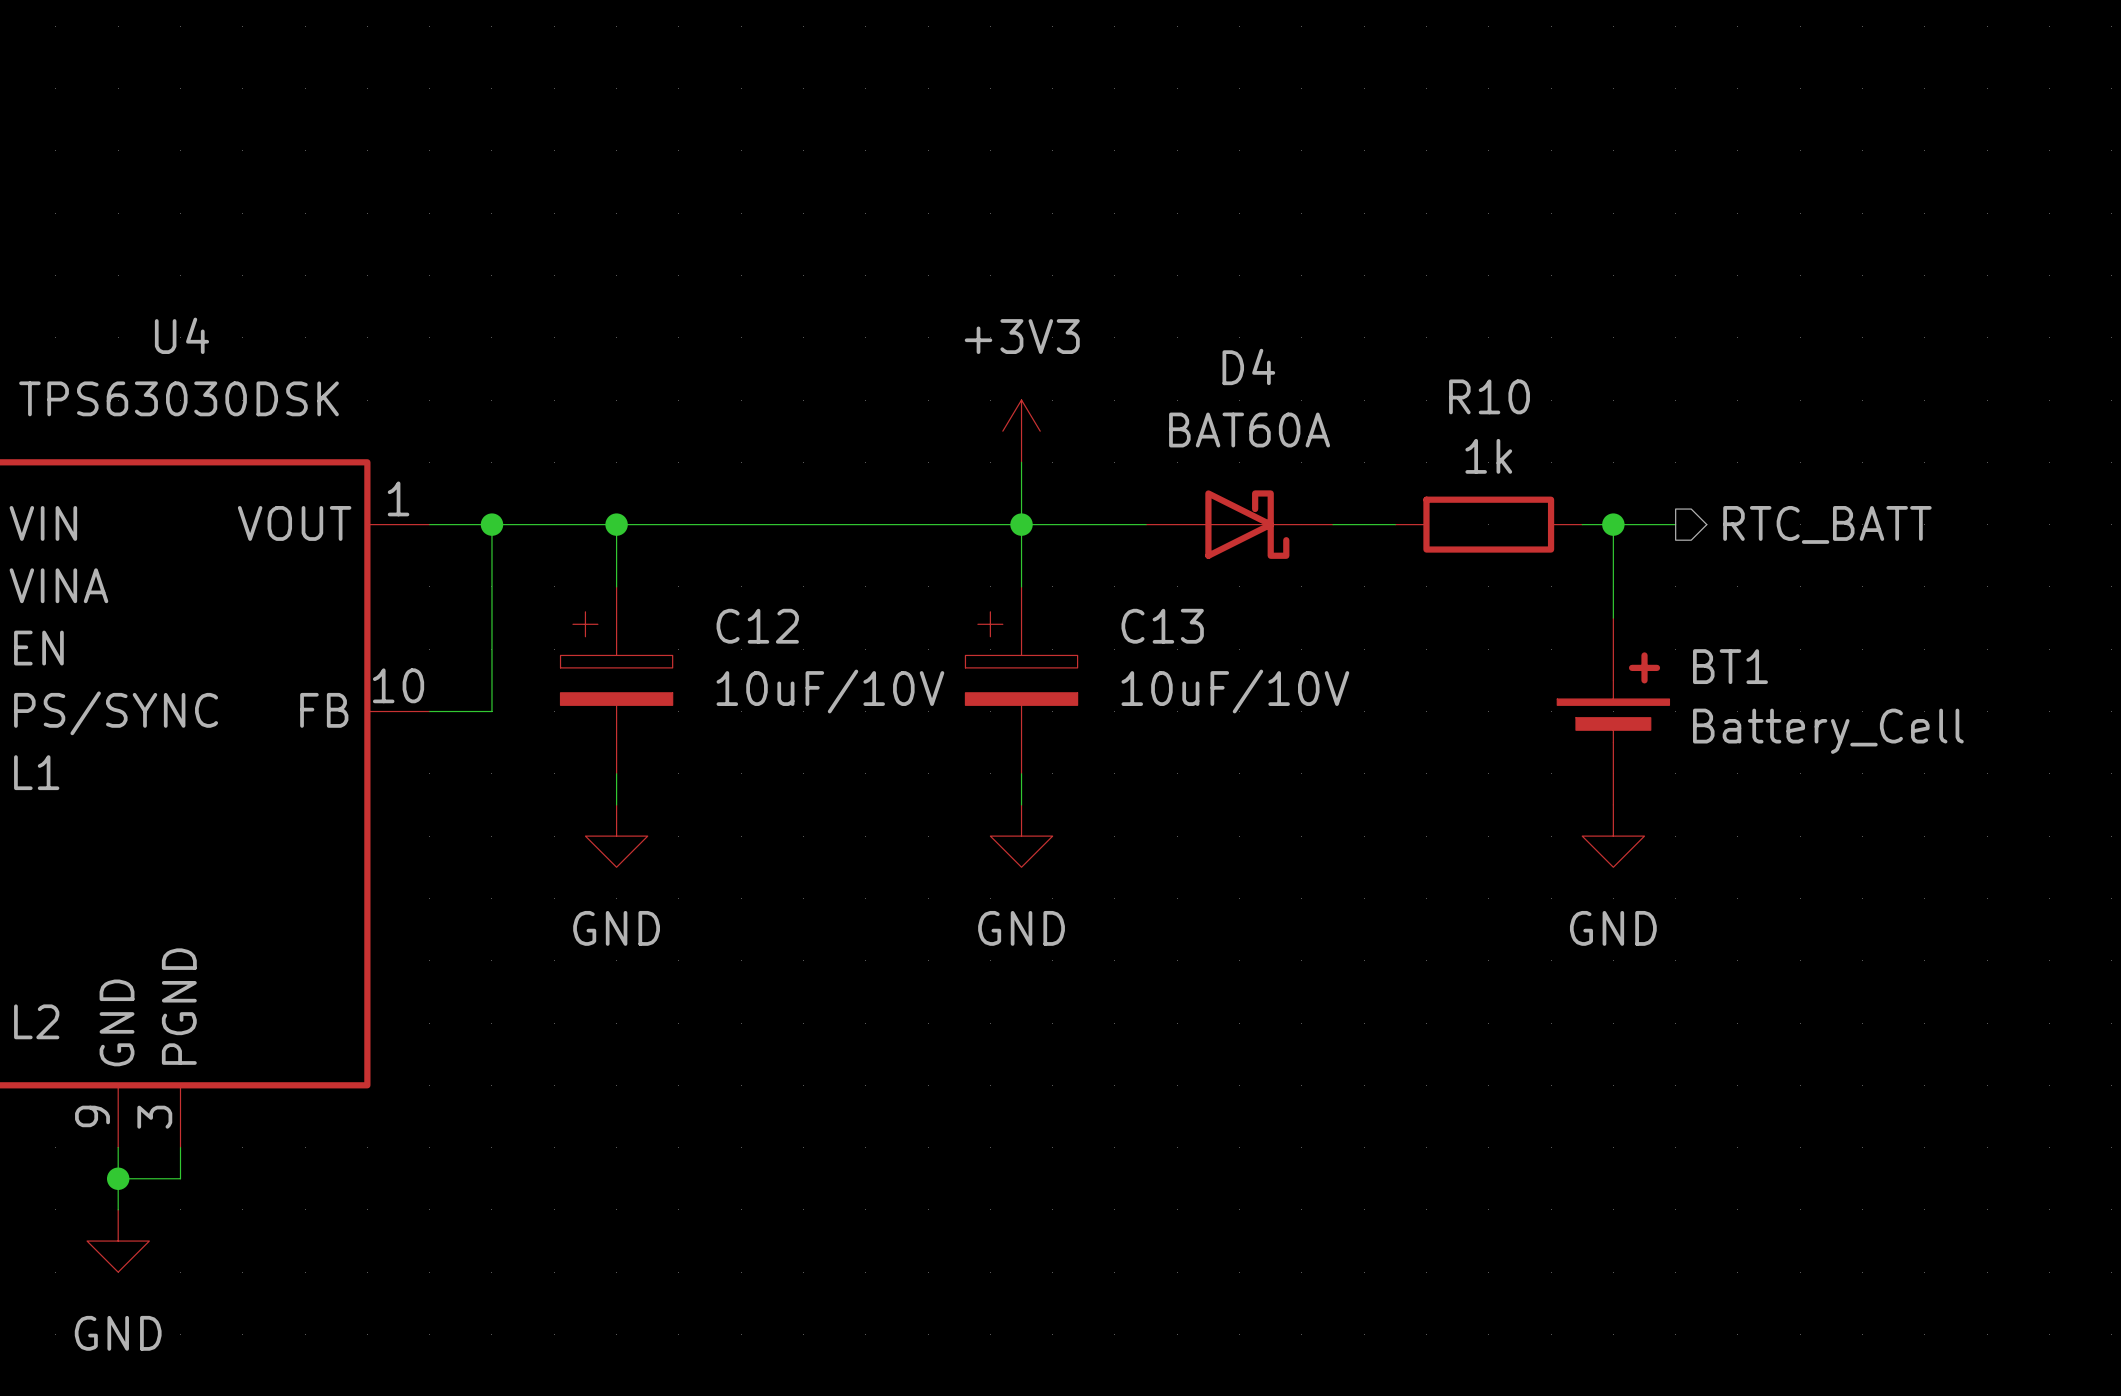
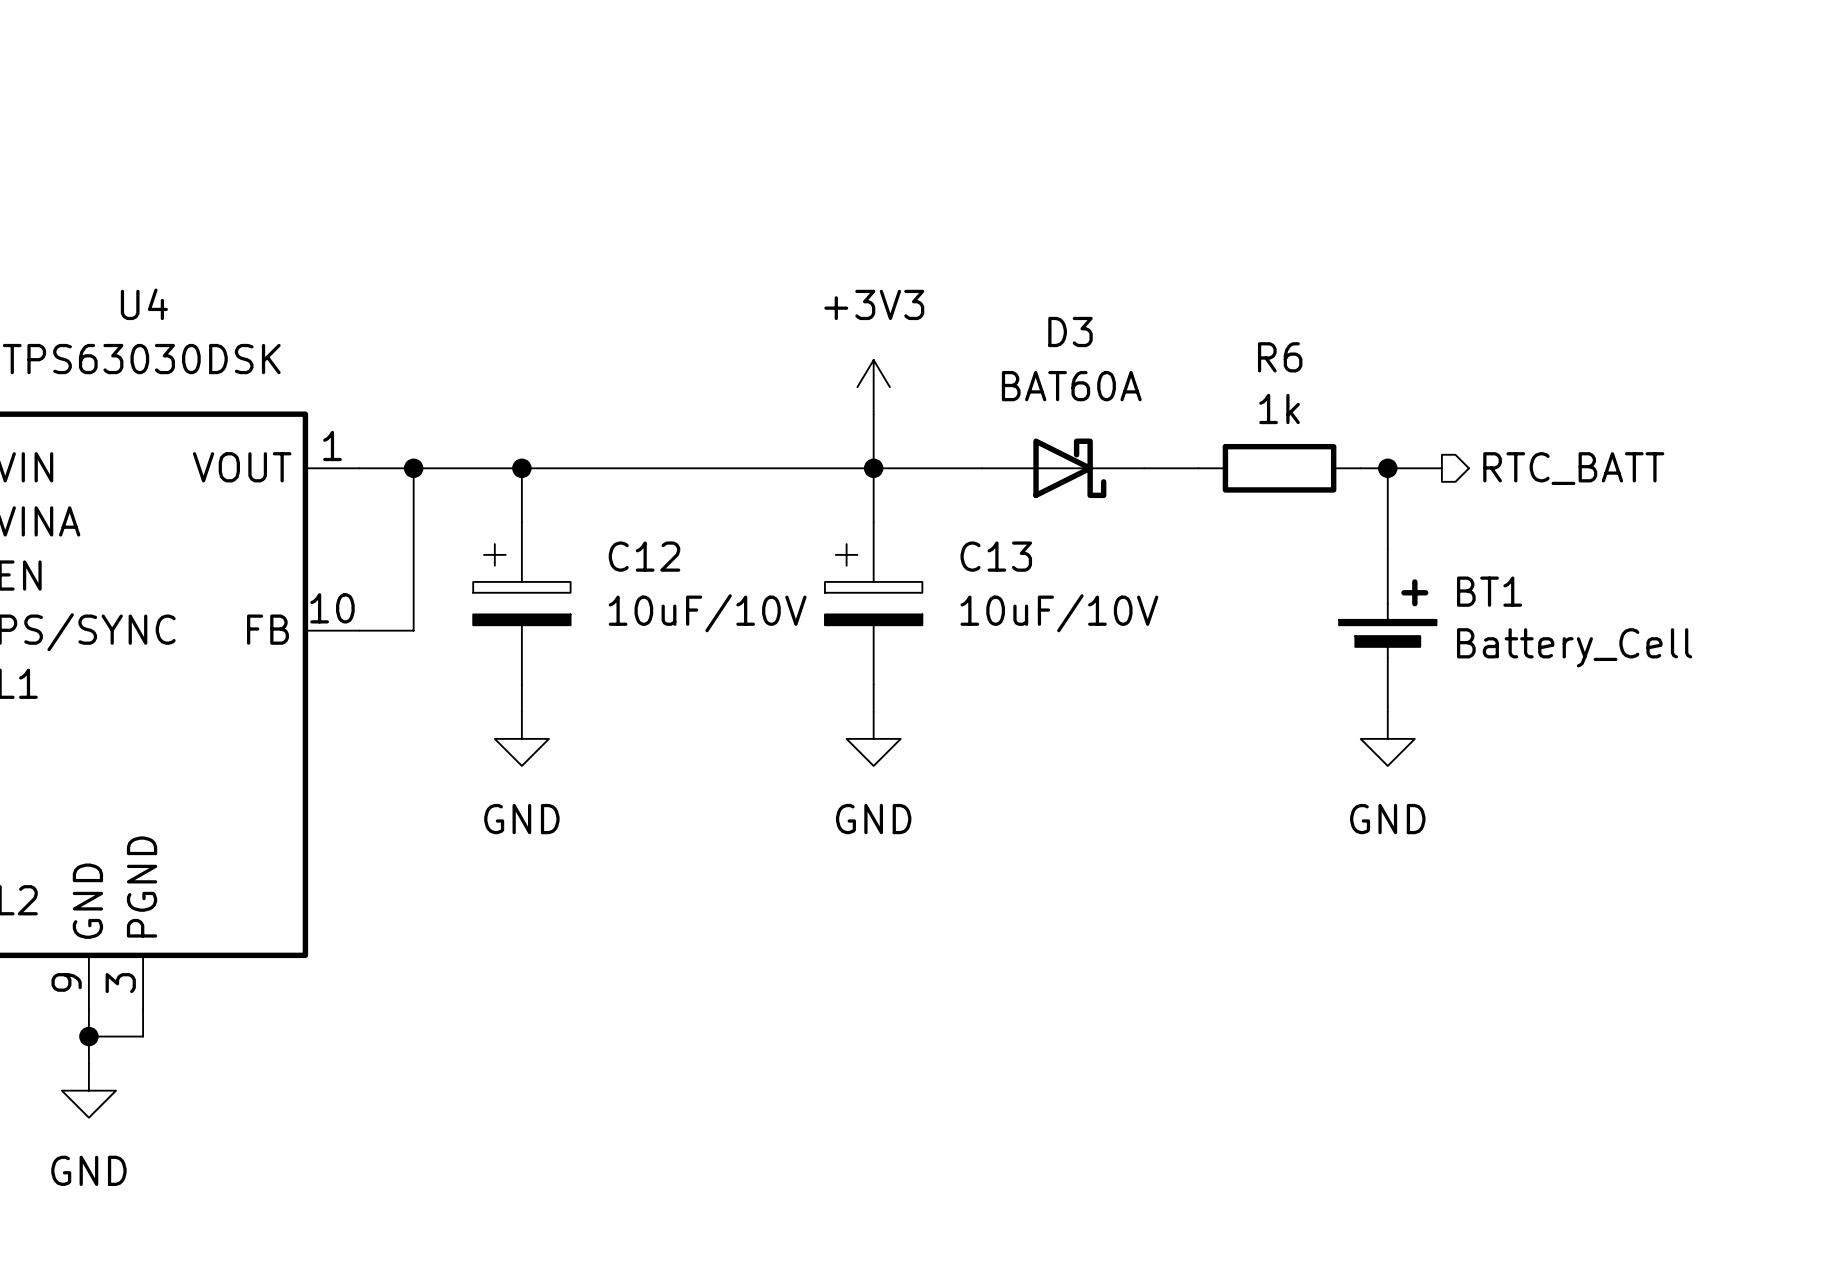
D4 name: D4 (1248, 366) -> D3 (1070, 331)
R10 name: R10 (1489, 396) -> R6 (1280, 357)

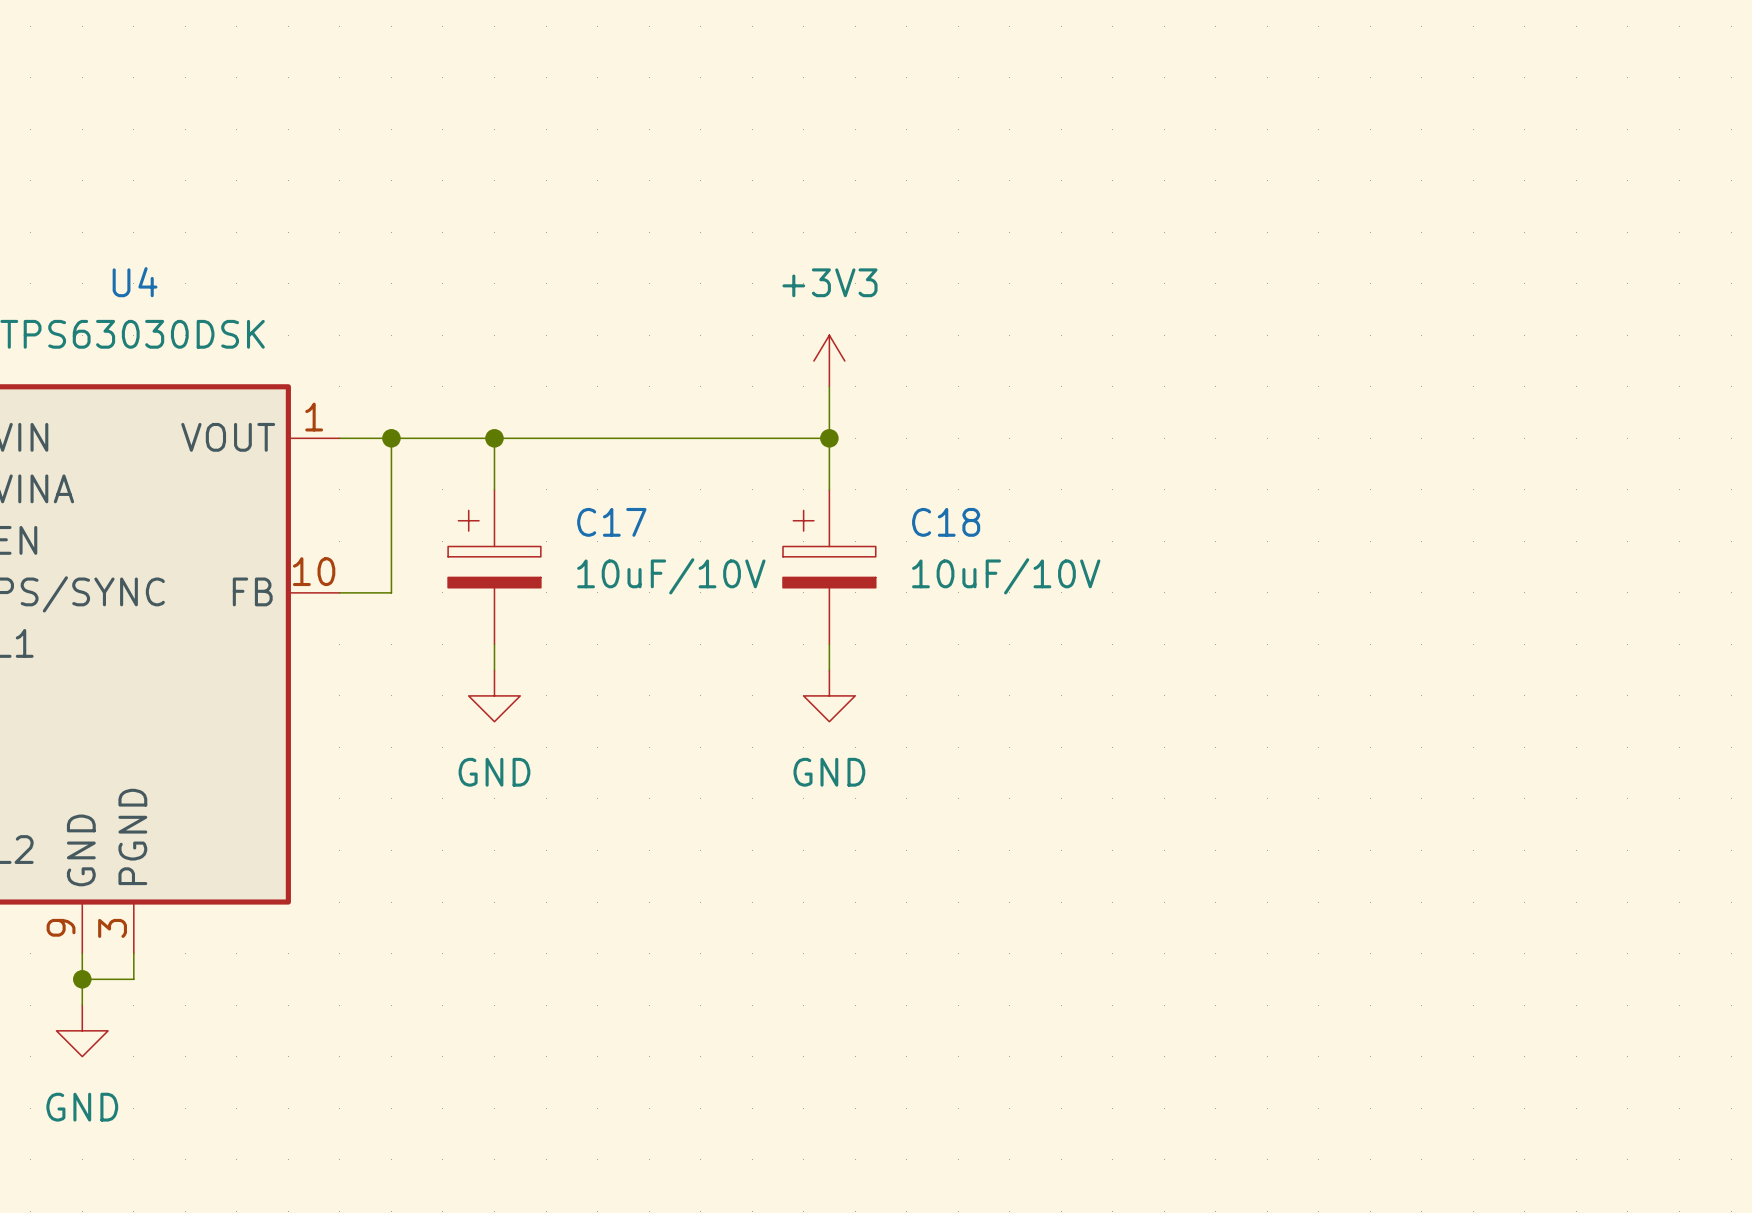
wire: (873, 468) (981, 468) -> none
D3: BAT60A (1063, 468) -> none
wire: (1144, 468) (1198, 468) -> none
R6: 1k (1279, 468) -> none
wire: (1360, 468) (1441, 468) -> none
wire: (1387, 468) (1387, 549) -> none
junction: (1387, 468) -> none
hierarchical label: RTC_BATT (1573, 468) -> none
C12 name: C12 (644, 556) -> C17 (611, 522)
C13 name: C13 (996, 556) -> C18 (946, 522)
BT1: Battery_Cell (1387, 630) -> none
power symbol: GND (1387, 738) -> none

